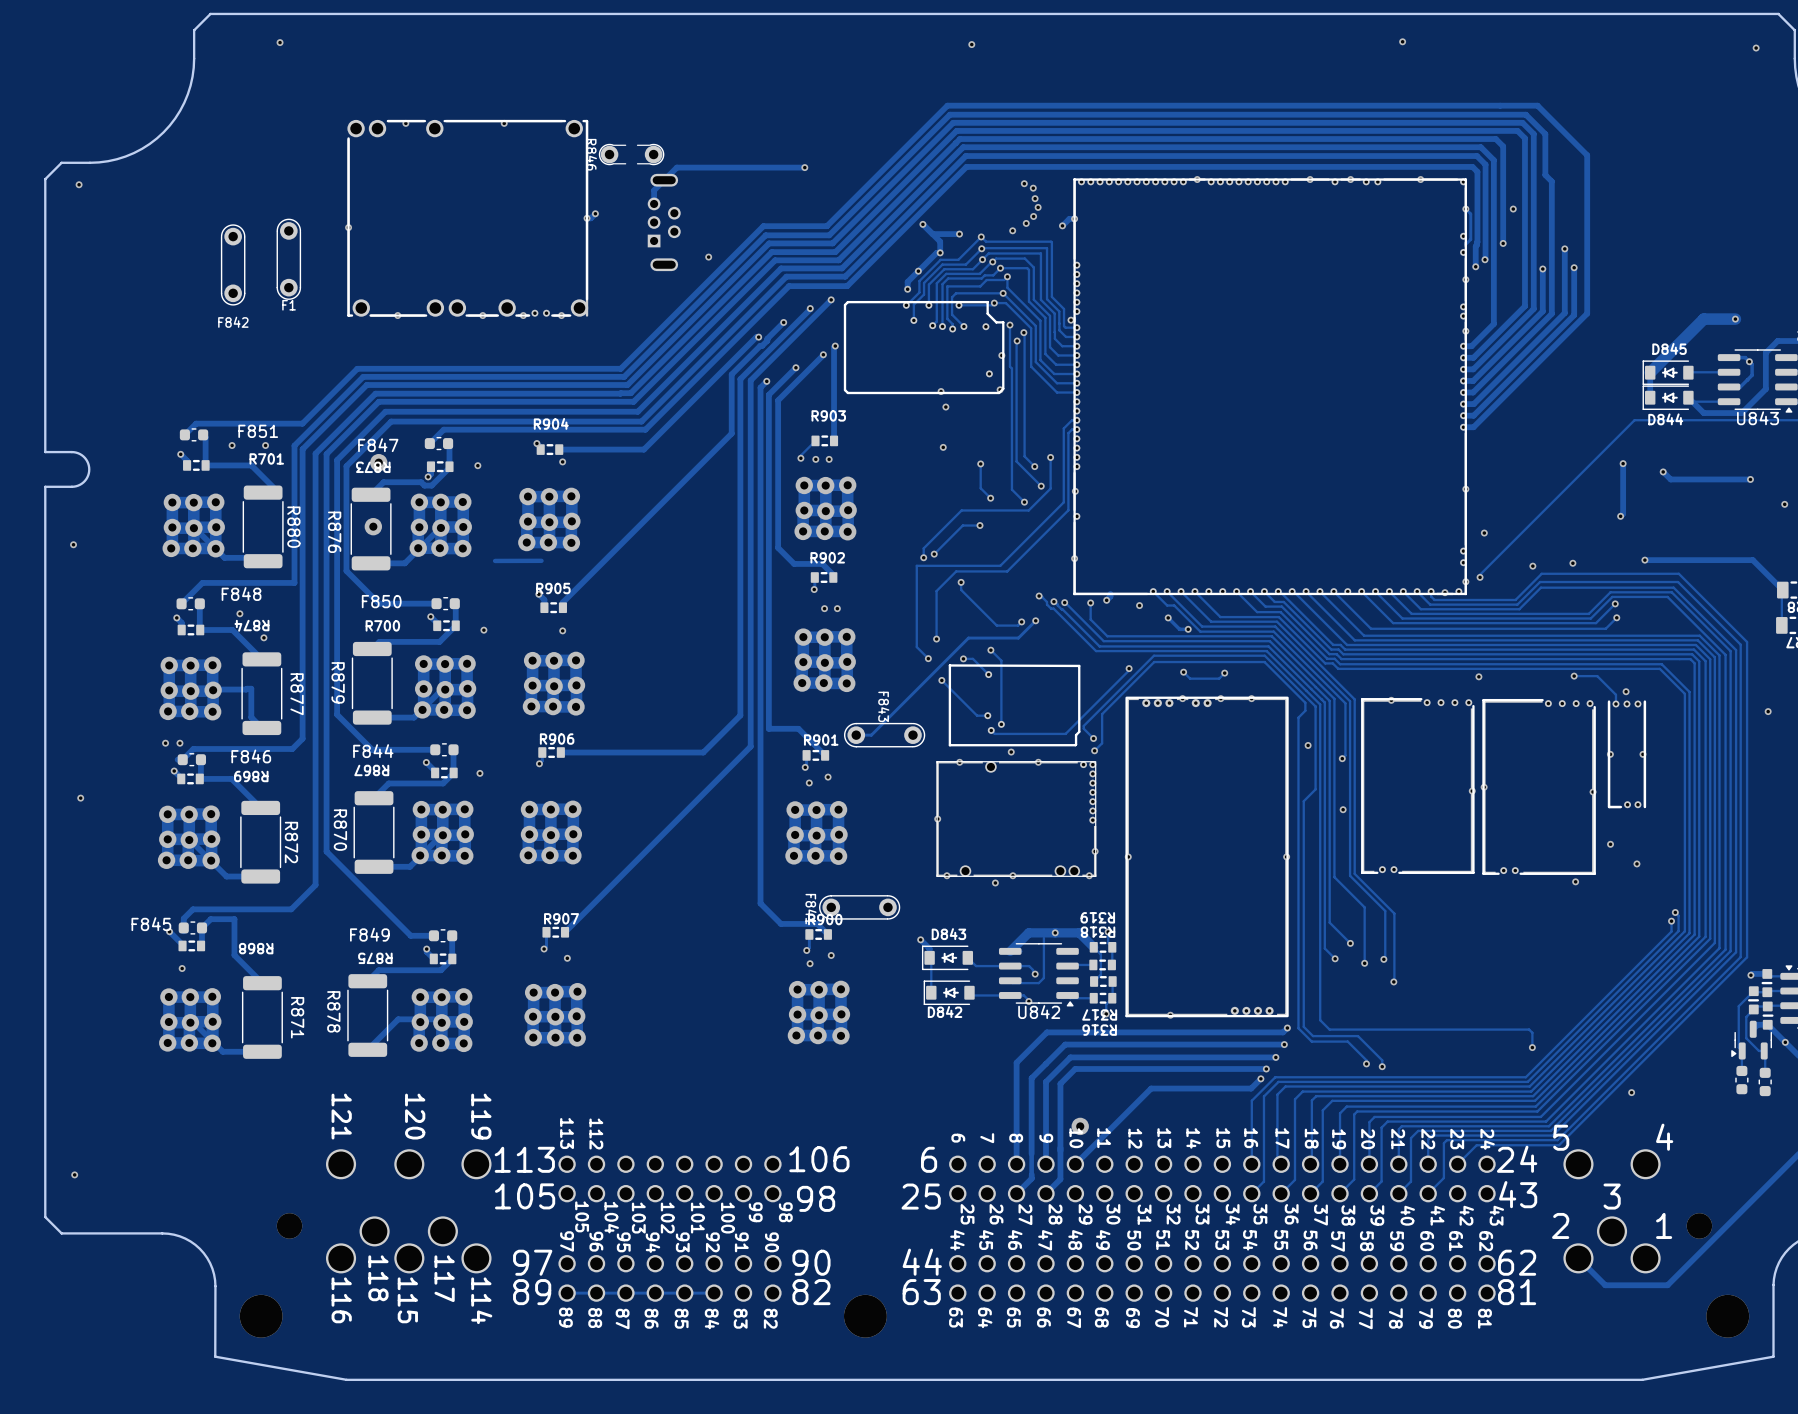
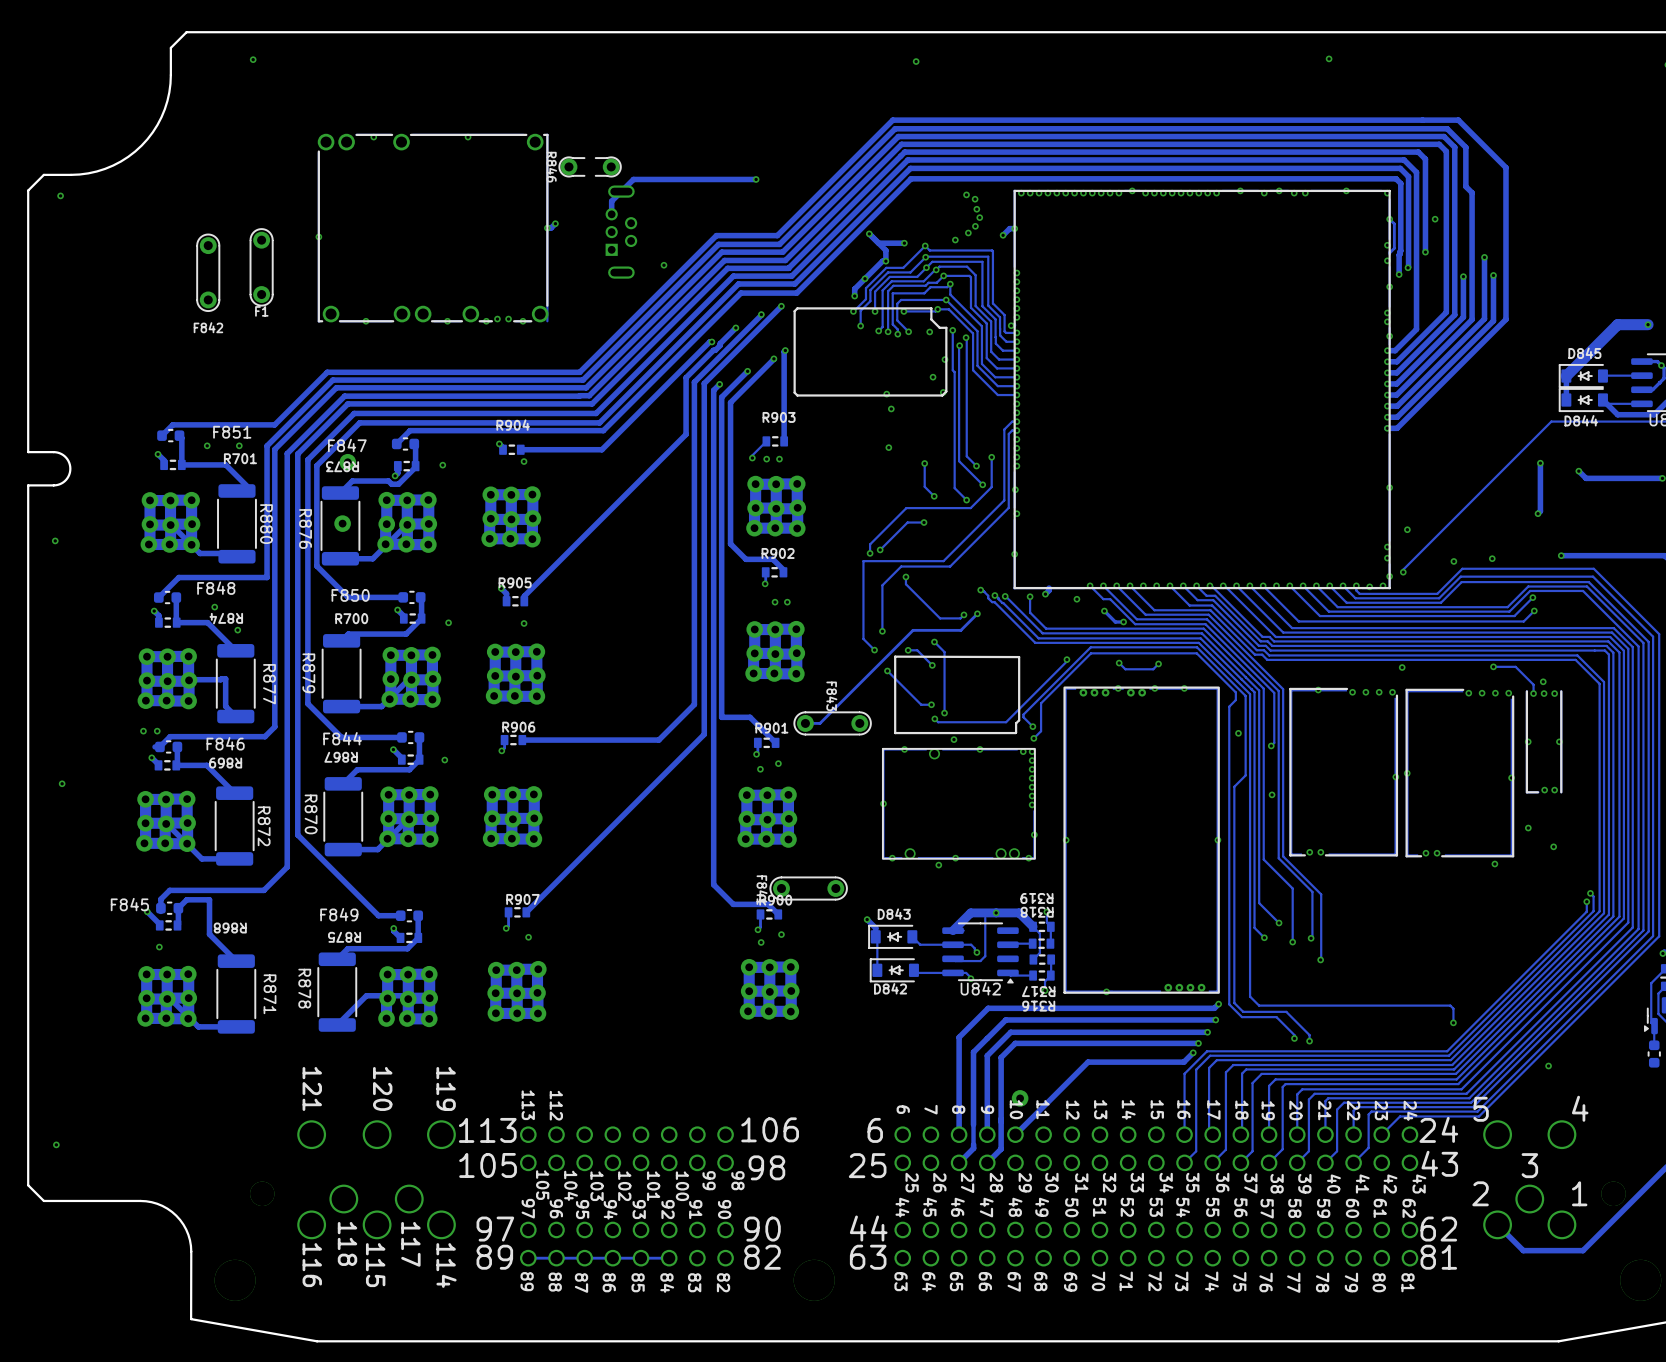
track: (541, 560) (495, 560) -> none

